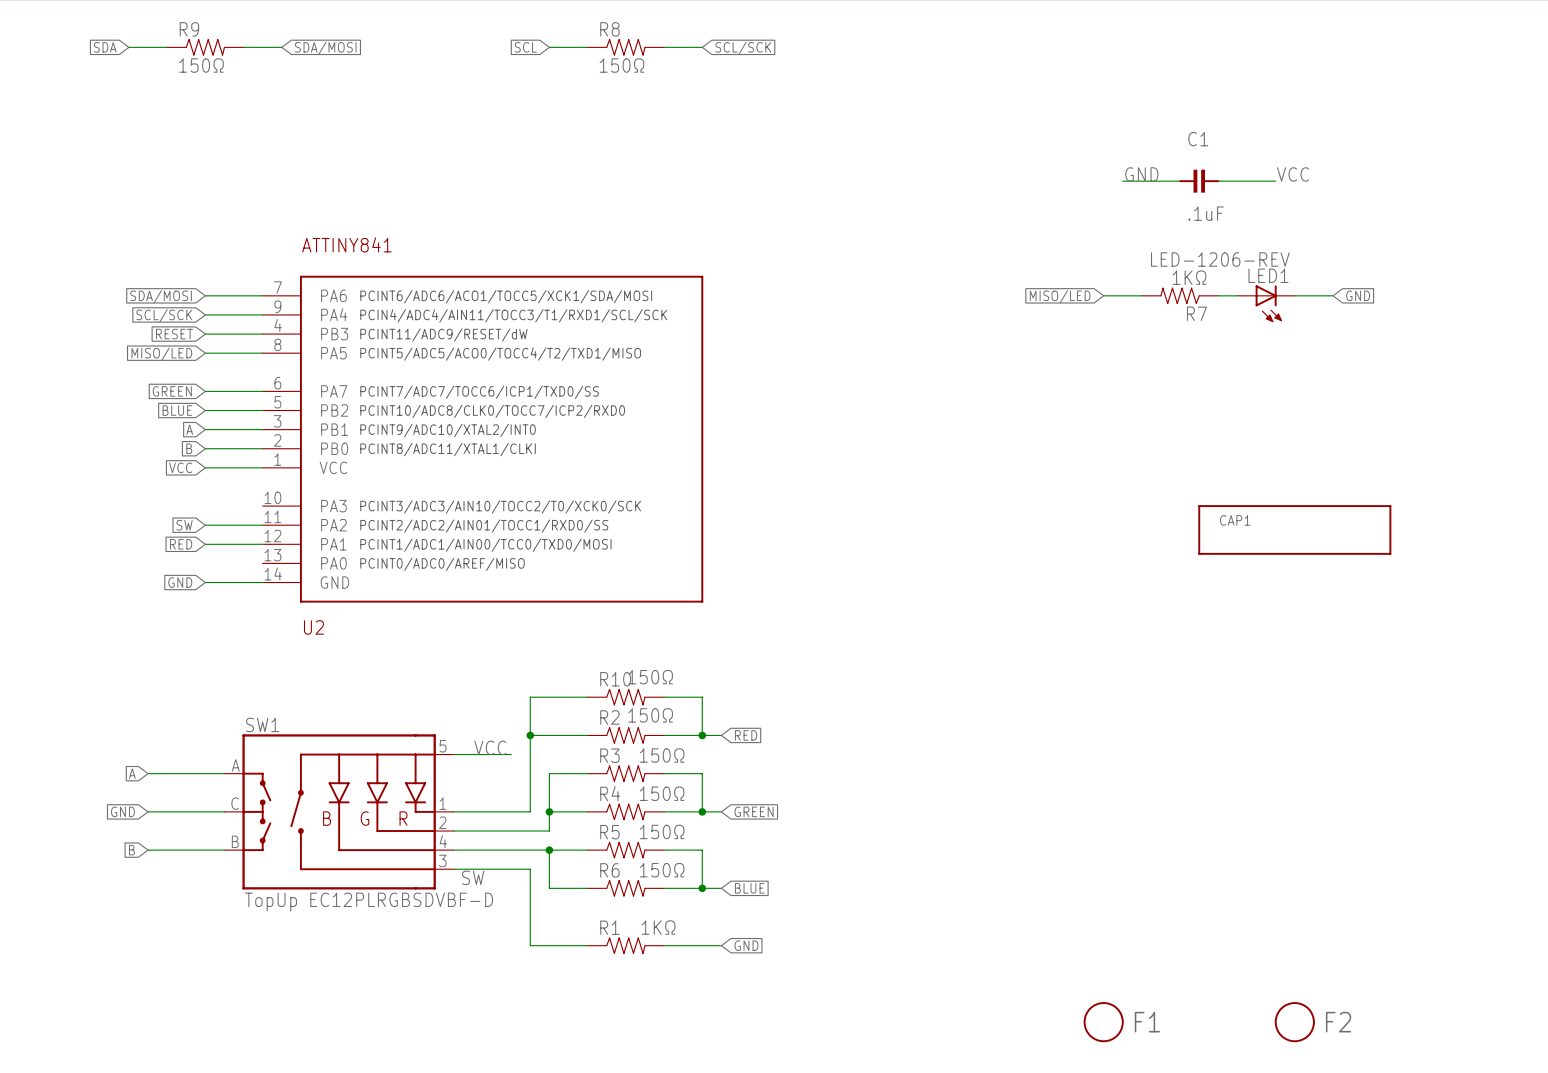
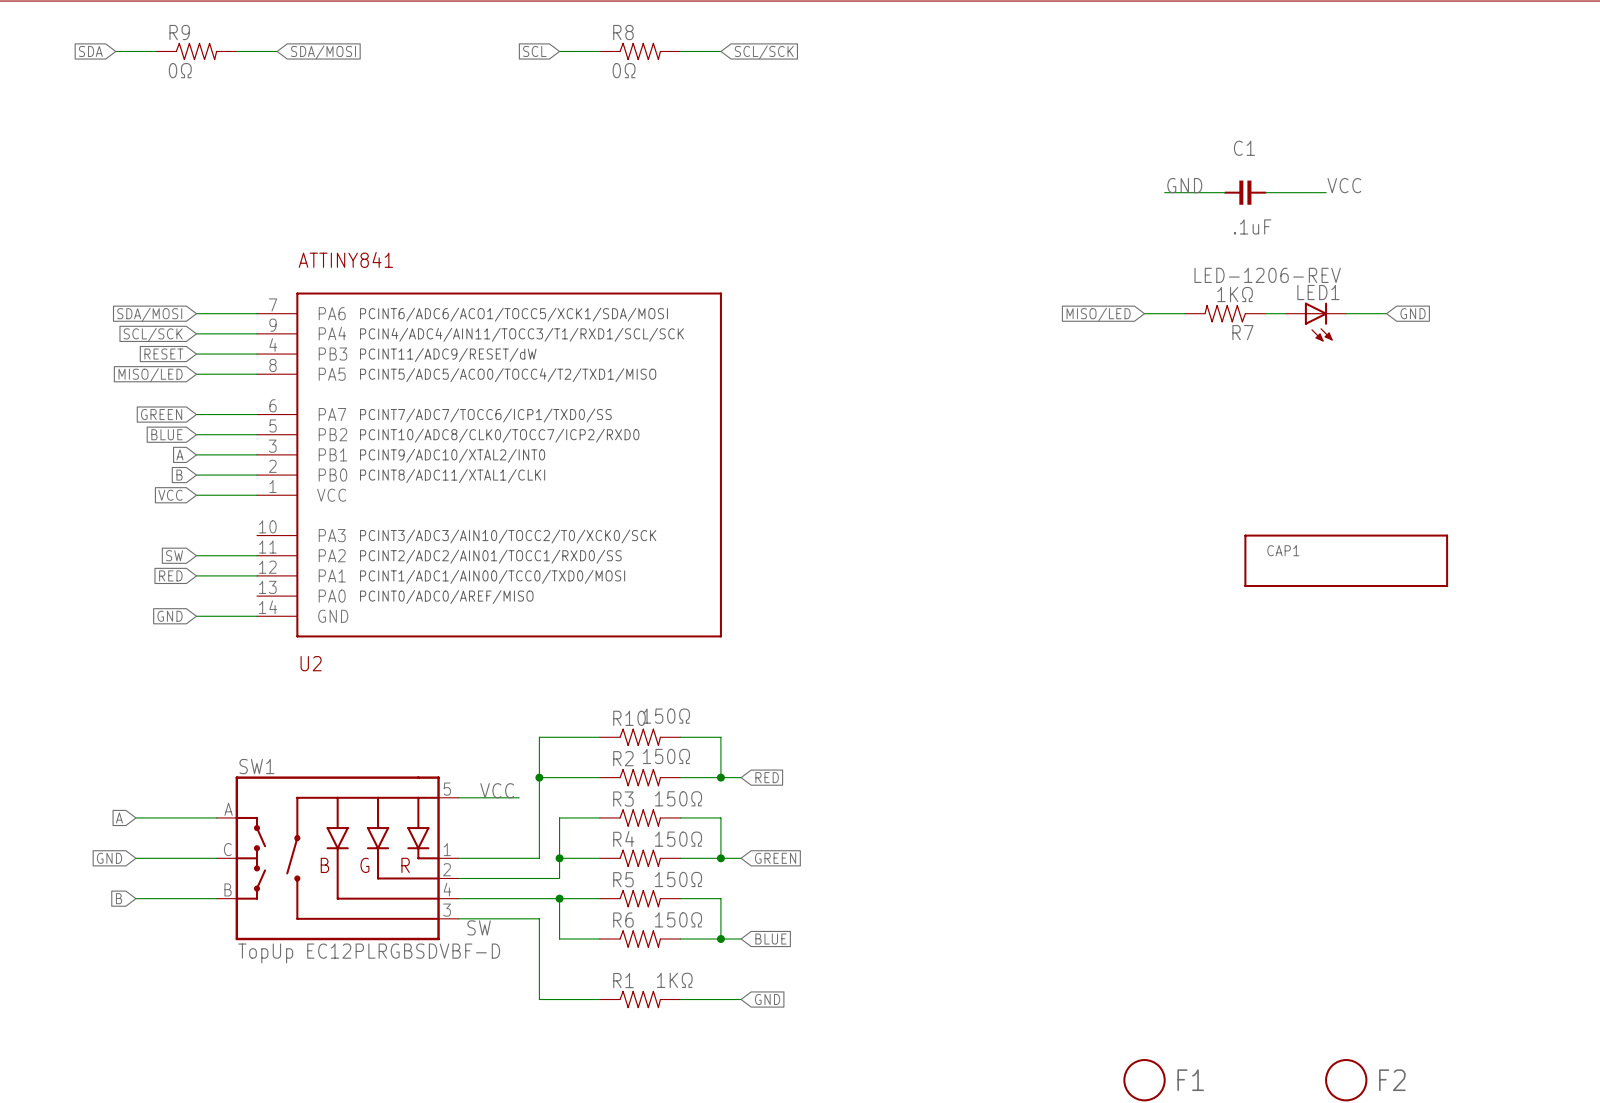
R9 value: 150Ω (201, 65) -> 0Ω (180, 70)
R8 value: 150Ω (621, 65) -> 0Ω (624, 70)

